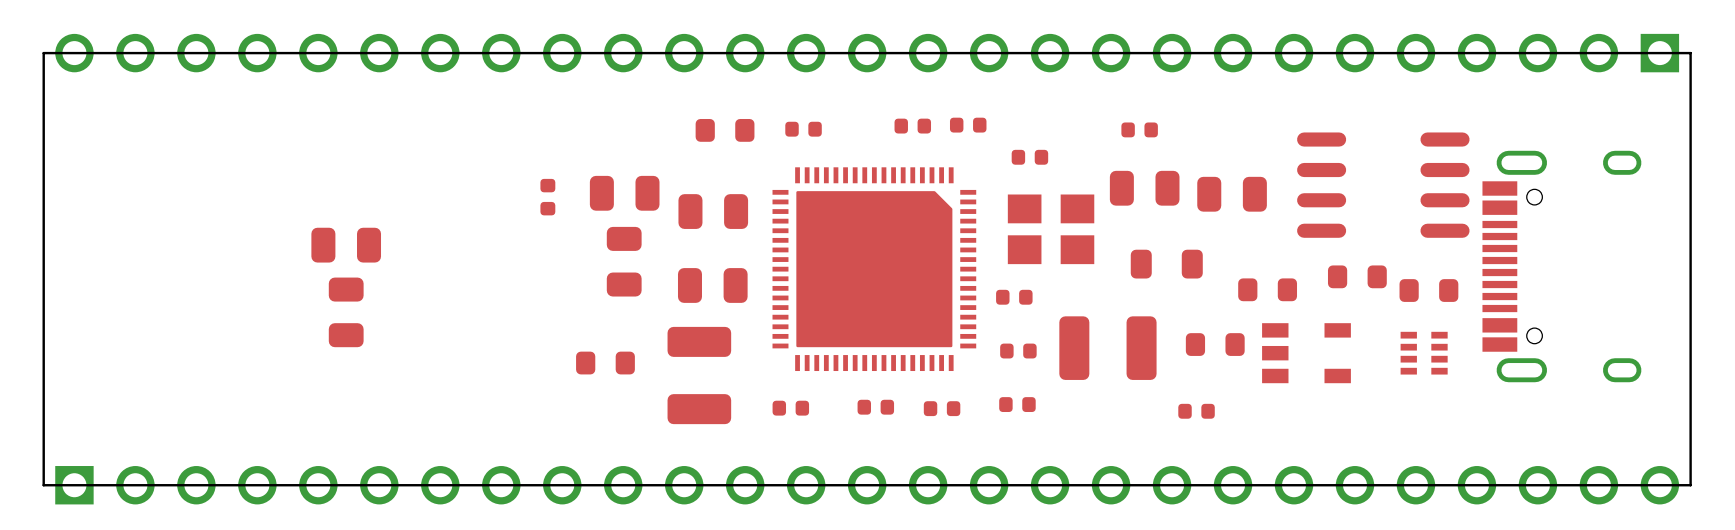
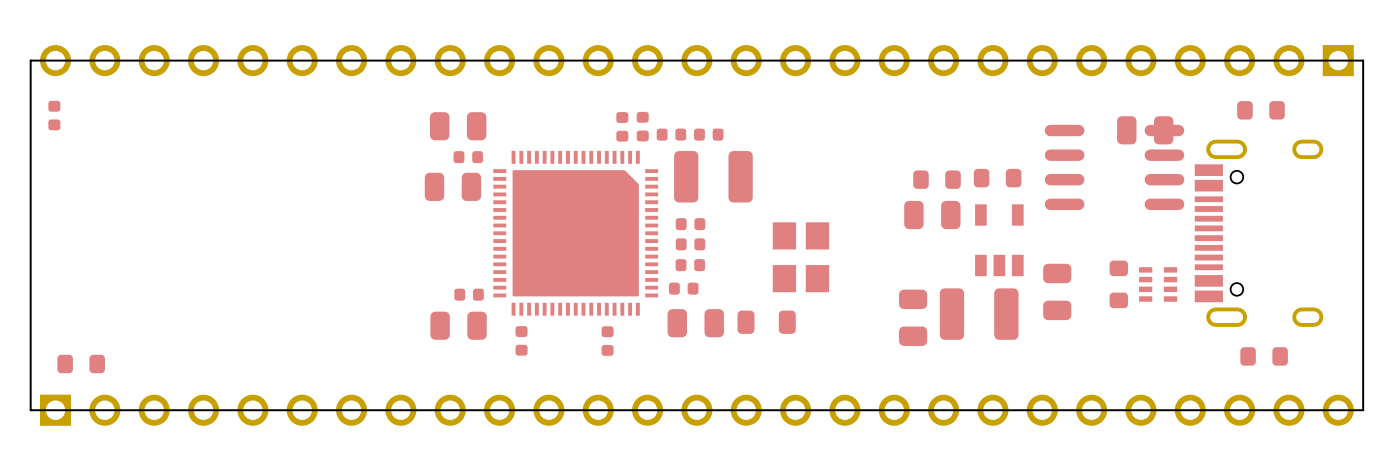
part: none -> (1260, 110)
part: none -> (54, 115)
part: (968, 125) -> none
part position: (912, 126) -> (708, 134)
part rotation: 0° (803, 129) -> 90° clockwise (642, 126)
part: (1139, 129) -> none
part: (725, 130) -> none
part: none -> (458, 126)
part: none -> (622, 126)
part: none -> (1145, 130)
part: none -> (671, 134)
part: (1029, 157) -> none
part footprint: [1109, 170, 1180, 206] -> [913, 170, 961, 189]
part: none -> (468, 157)
part footprint: [1197, 176, 1267, 212] -> [973, 168, 1022, 188]
part footprint: [540, 178, 556, 216] -> [424, 172, 482, 201]
part: (624, 193) -> none
part: none -> (713, 176)
part: (713, 211) -> none
part: (1051, 229) -> none
part: (346, 245) -> none
part footprint: [1130, 249, 1203, 279] -> [904, 200, 961, 230]
part: none -> (690, 224)
part: (624, 261) -> none
part footprint: [677, 268, 748, 303] -> [493, 150, 659, 316]
part: (874, 269) -> none
part: none -> (999, 240)
part: (1357, 276) -> none
part: none -> (690, 244)
part footprint: [996, 289, 1033, 305] -> [772, 222, 830, 293]
part: (1267, 289) -> none
part: (1428, 290) -> none
part: none -> (690, 265)
part: (346, 312) -> none
part footprint: [1262, 323, 1351, 384] -> [1043, 263, 1072, 321]
part: none -> (1118, 284)
part footprint: [1185, 333, 1245, 356] -> [939, 288, 1019, 340]
part: none -> (683, 288)
part: none -> (469, 294)
part: (1107, 348) -> none
part: (1018, 351) -> none
part position: (1424, 353) -> (1158, 284)
part: (605, 363) -> none
part: none -> (913, 317)
part: (699, 375) -> none
part: none -> (766, 322)
part: none -> (695, 323)
part: none -> (458, 325)
part: none -> (521, 340)
part: (1017, 404) -> none
part: (875, 407) -> none
part rotation: 0° (790, 408) -> 90° clockwise (607, 341)
part position: (790, 408) -> (607, 341)
part: (942, 408) -> none
part: (1196, 411) -> none
part: none -> (1264, 356)
part: none -> (81, 364)

